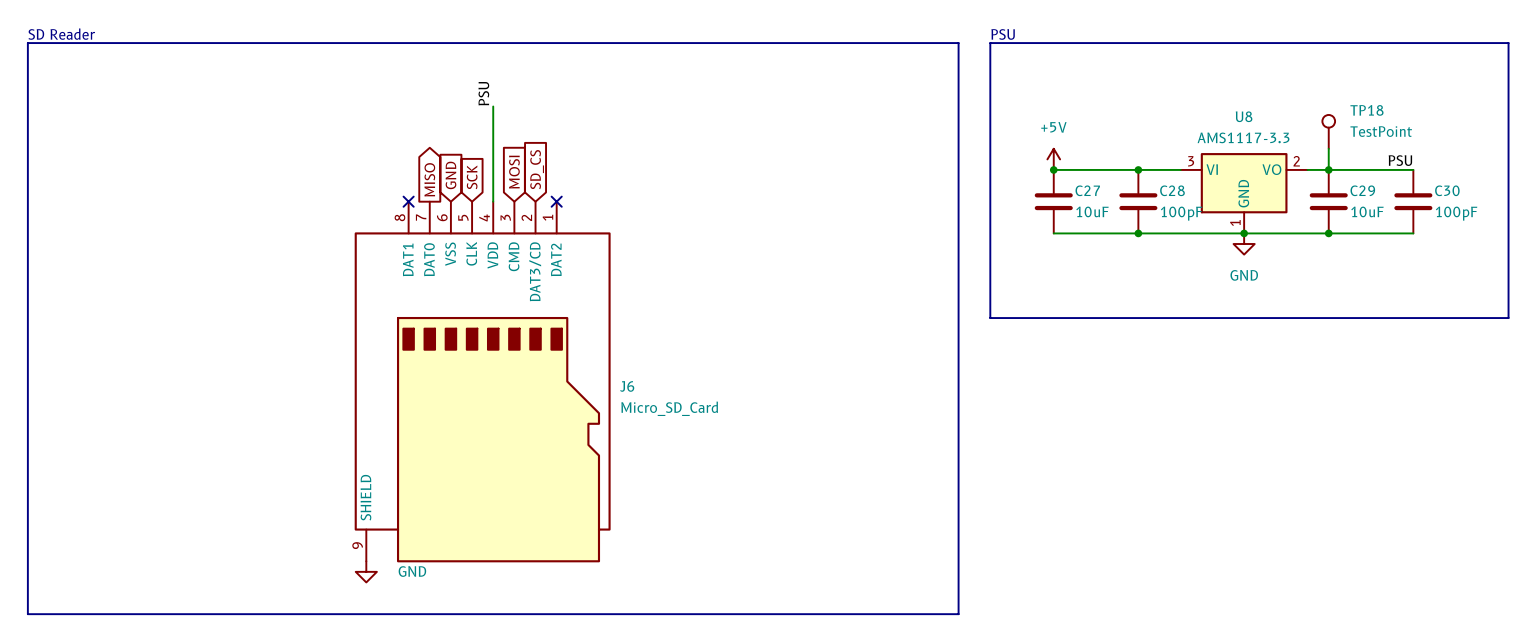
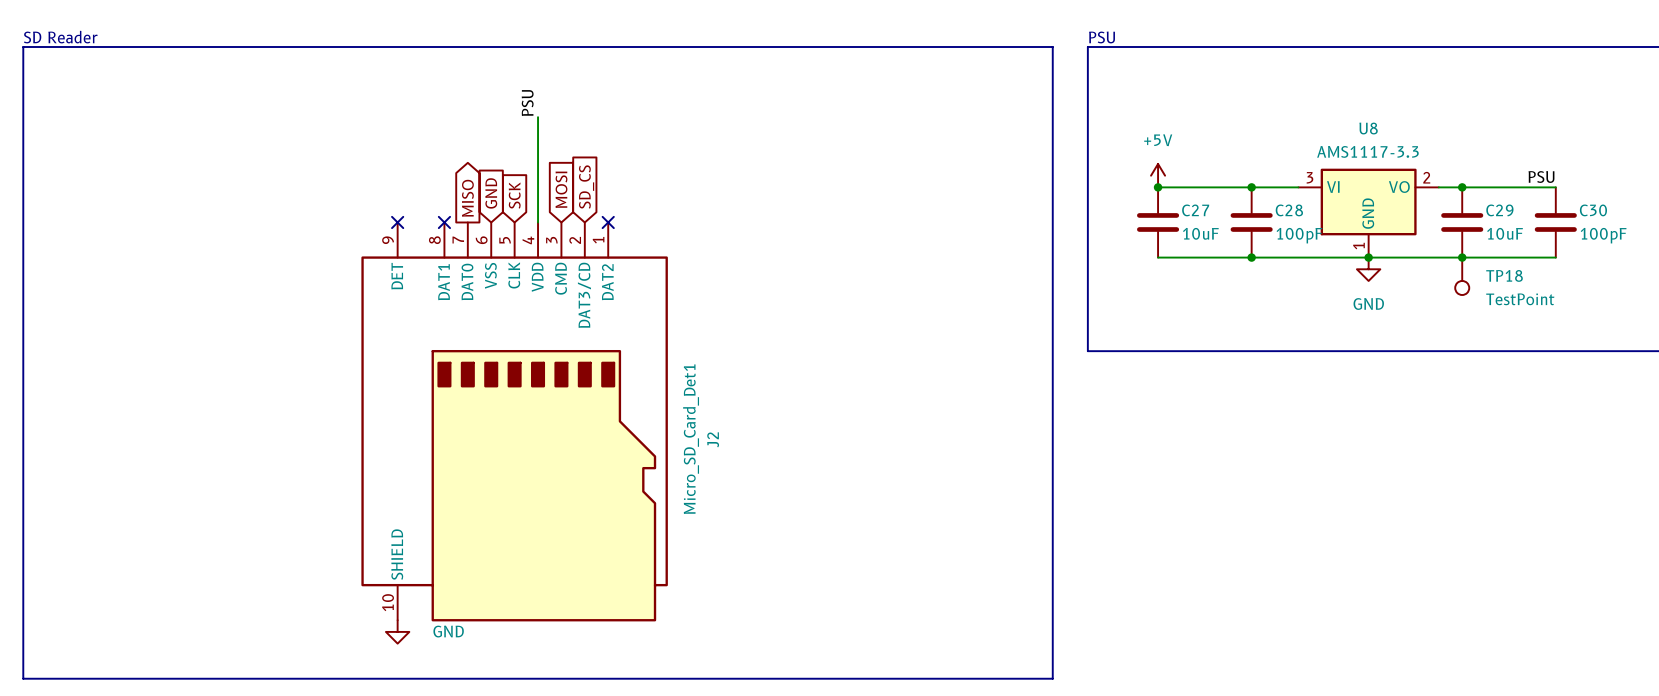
TP18 name position: TP18 (1366, 110) -> TP18 (1504, 275)
TP18 rotation: 0° (1328, 121) -> 180° (1462, 287)
TP18 position: (1328, 131) -> (1462, 276)
TP18 value position: TestPoint (1381, 131) -> TestPoint (1520, 299)
wire: (1328, 148) (1328, 169) -> none
no-connect mark: none -> (397, 222)
J2: none -> Micro_SD_Card_Det1 (514, 421)
J6: Micro_SD_Card (482, 382) -> none

